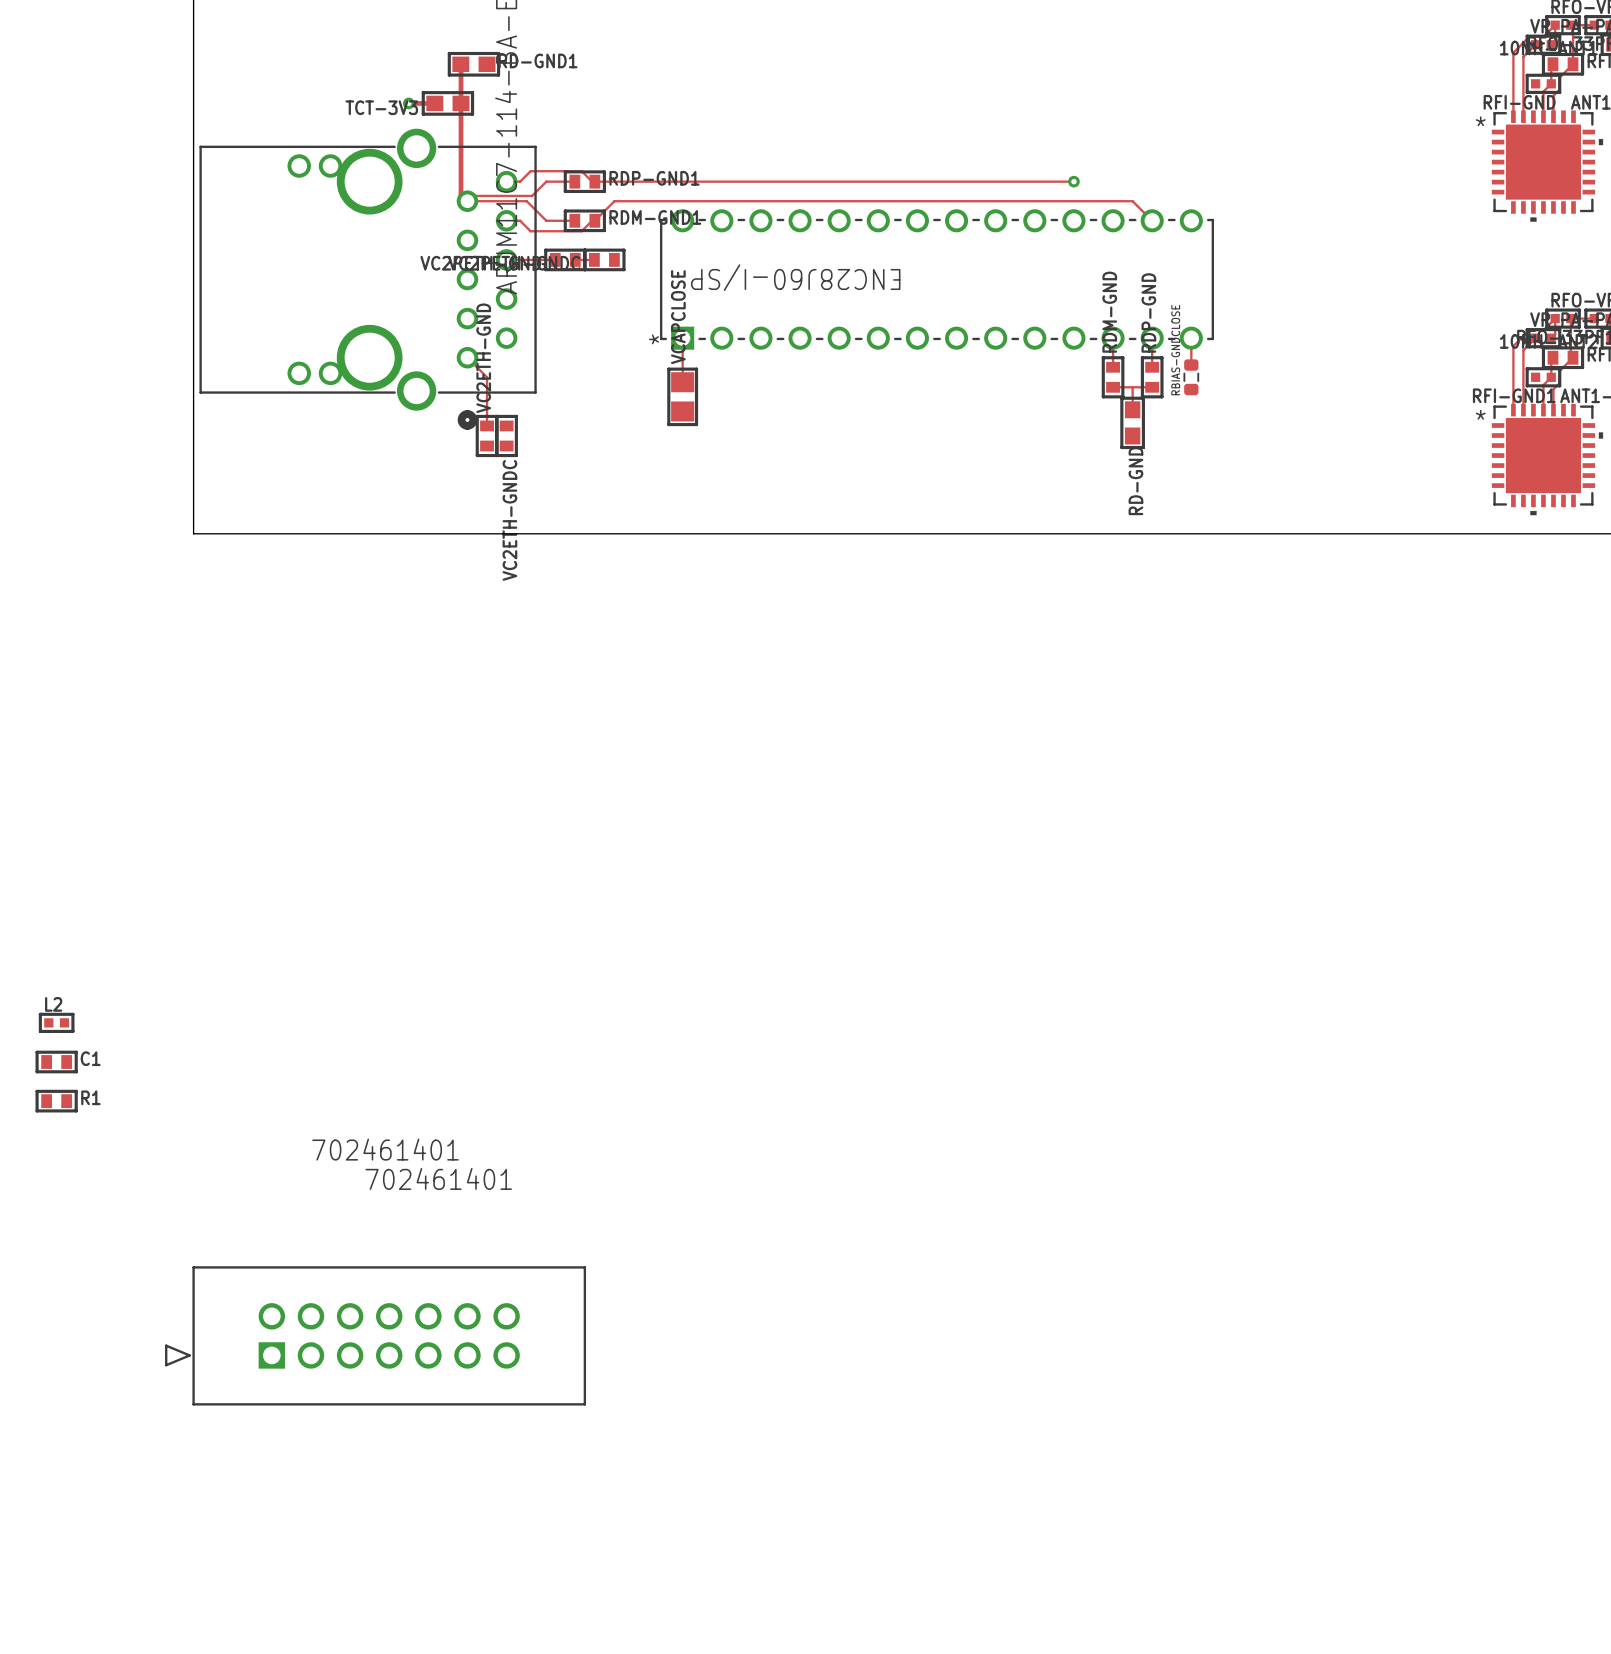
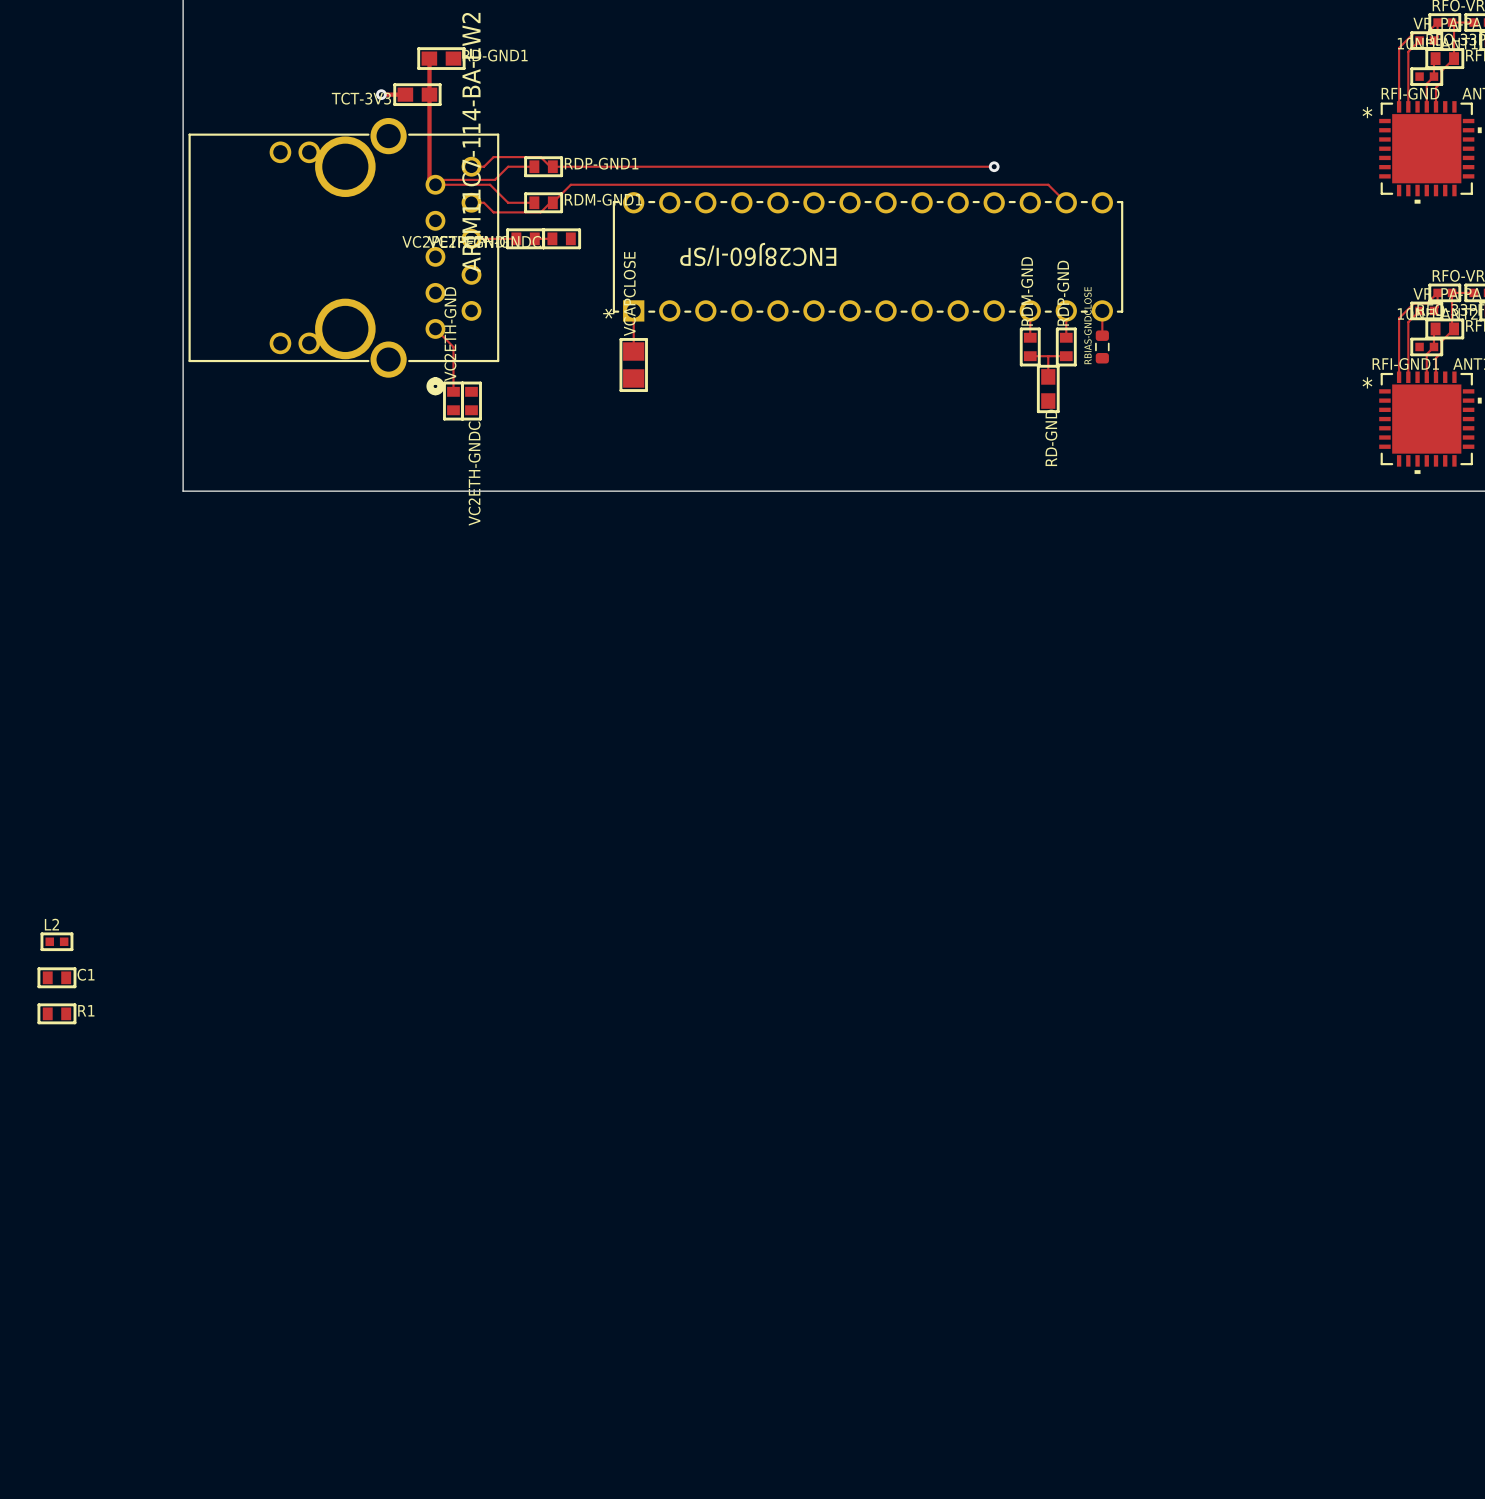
part: 702461401 (375, 1335) -> none

